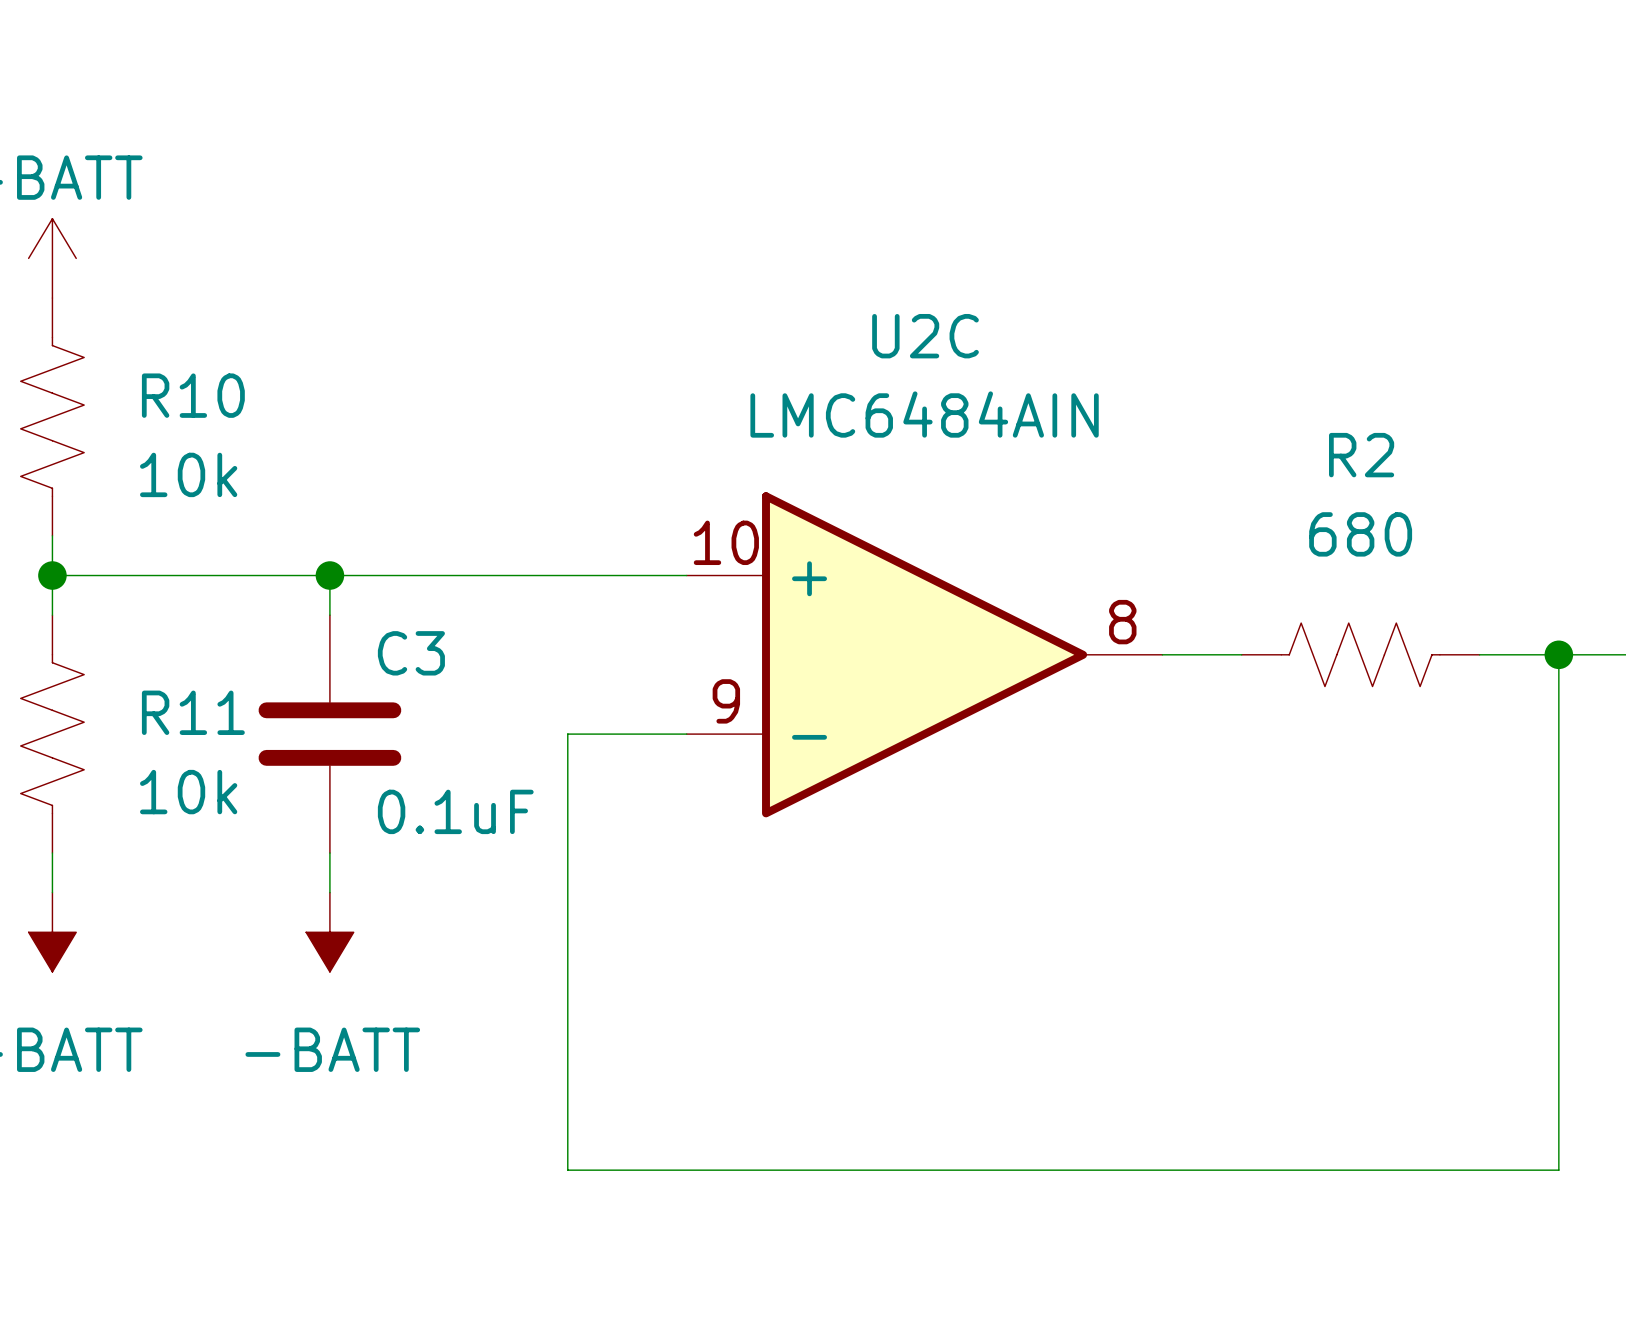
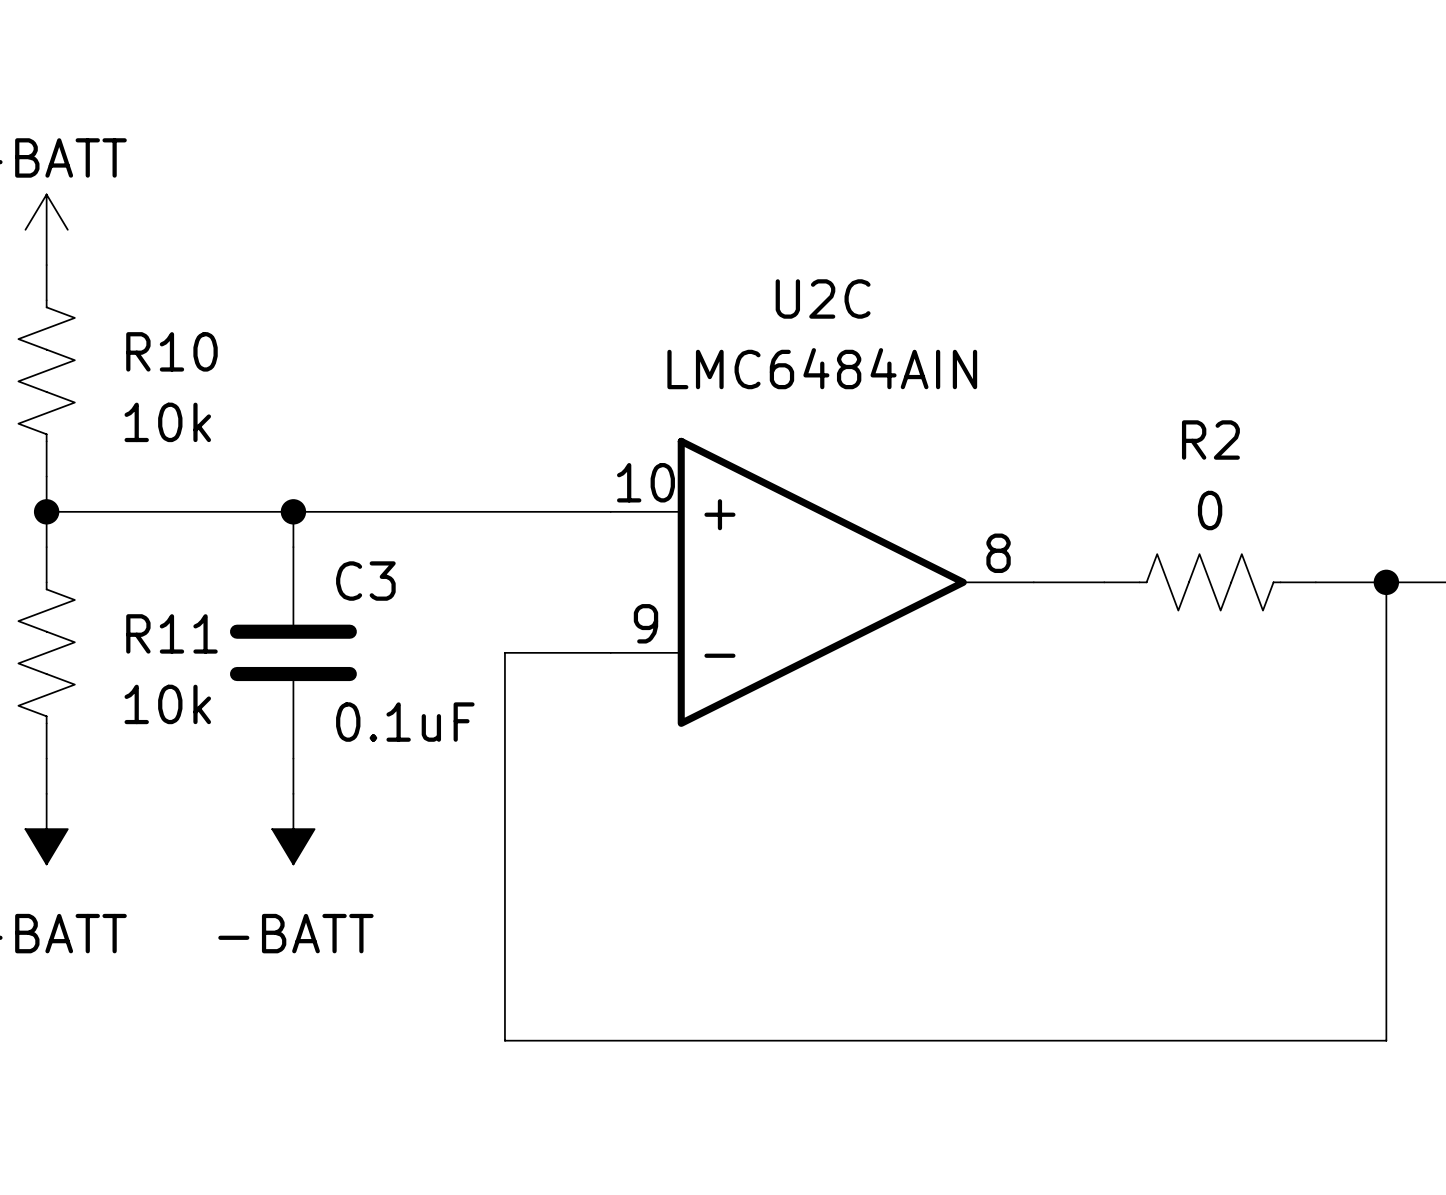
R2 name position: R2 (1361, 455) -> R2 (1210, 440)
R2 value: 680 (1360, 534) -> 0 (1210, 510)

